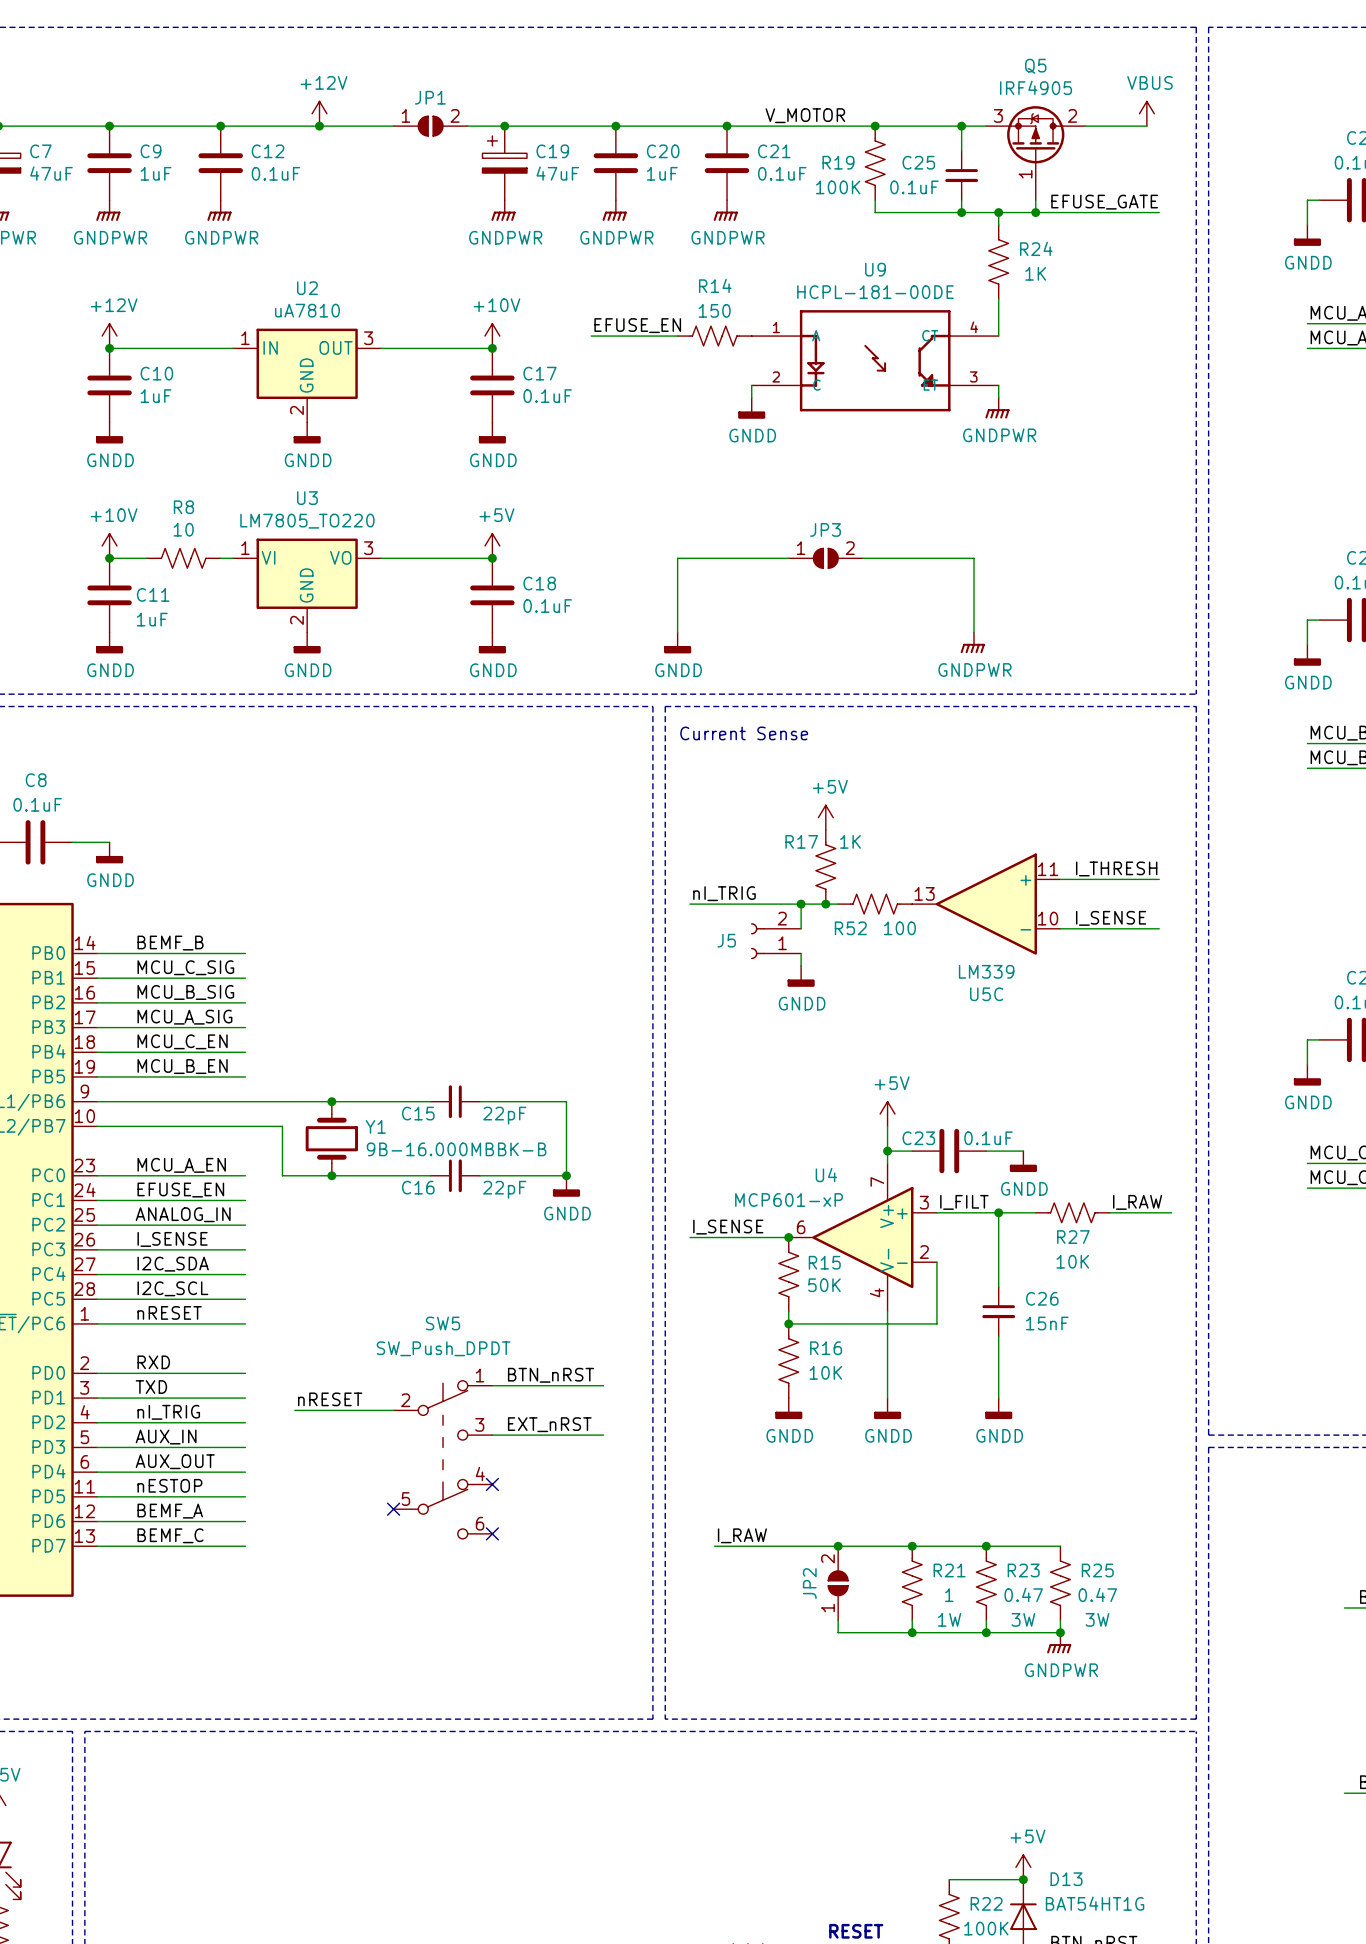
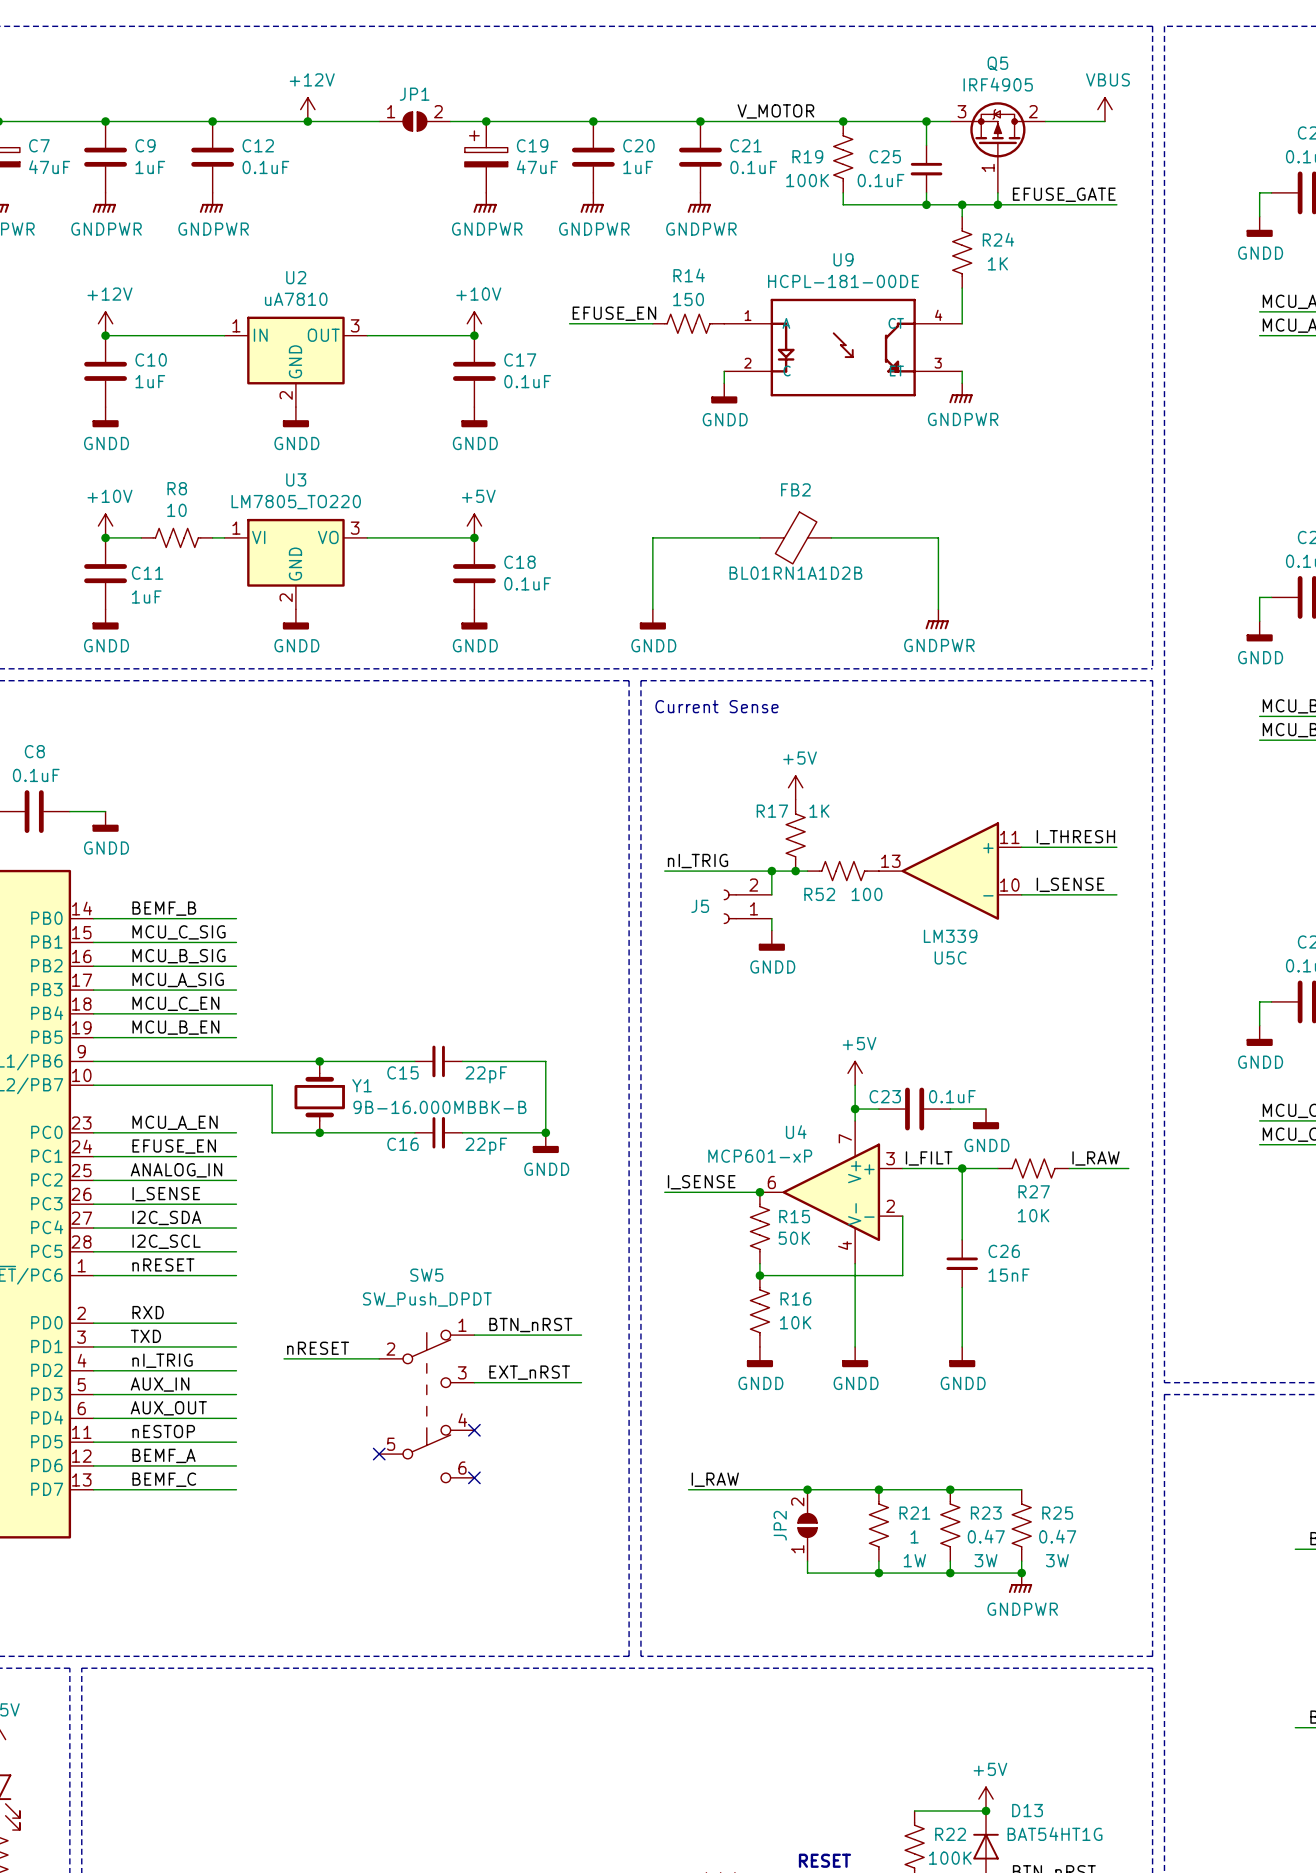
JP3: (825, 558) -> none
FB2: none -> BL01RN1A1D2B (795, 537)

